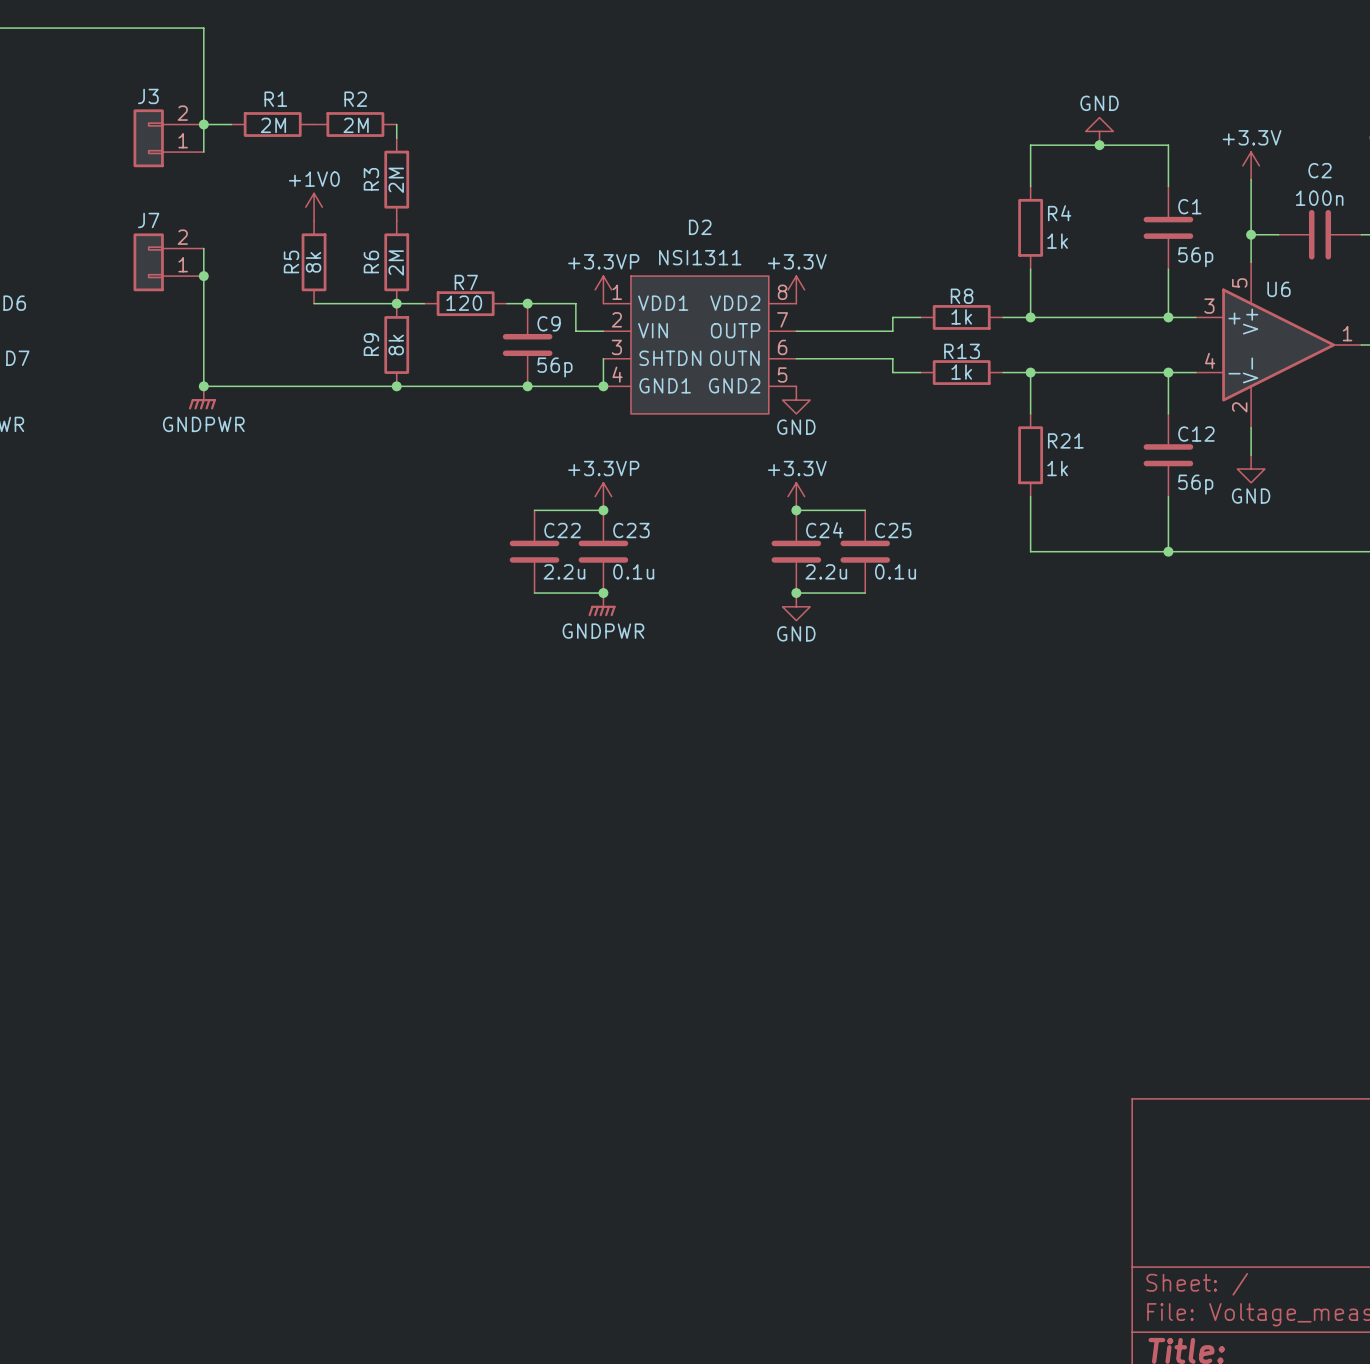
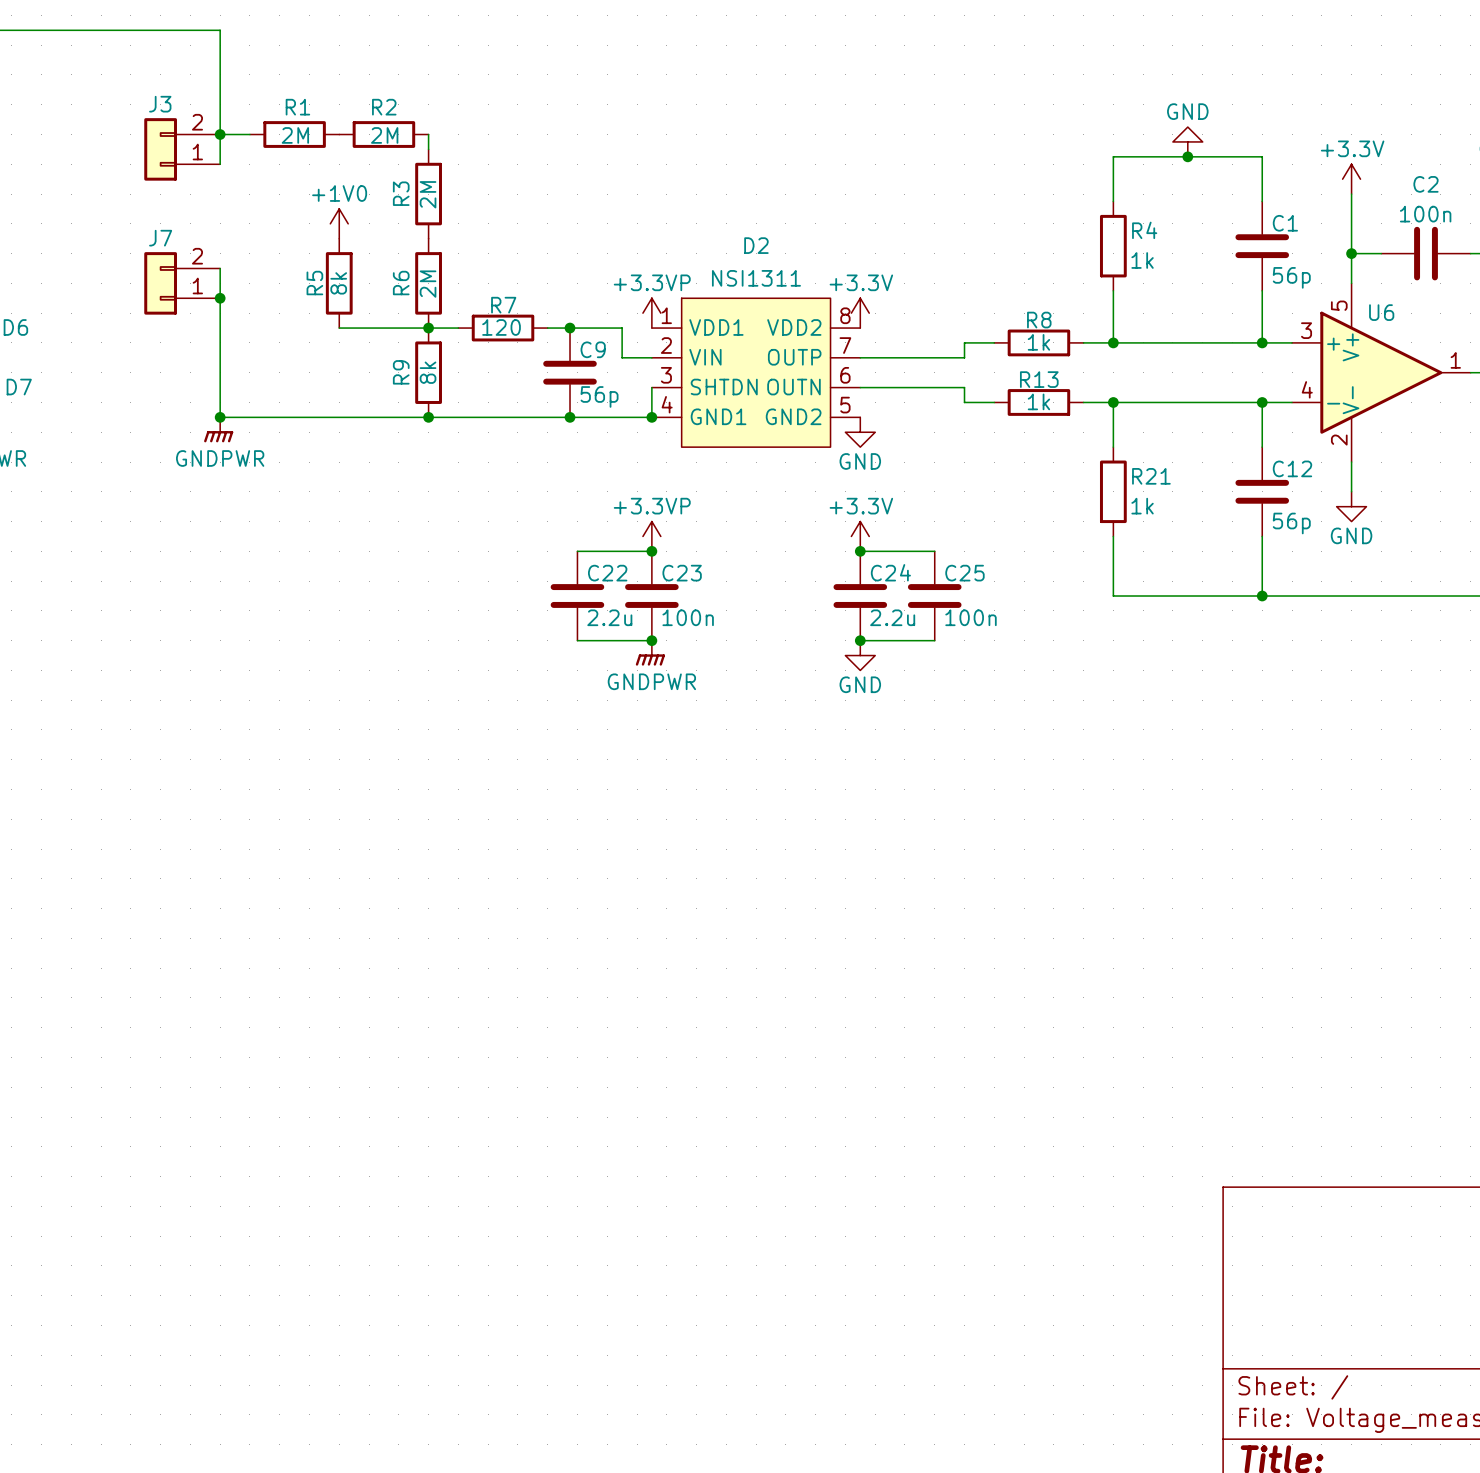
C23 value: 0.1u (633, 571) -> 100n (688, 617)
C25 value: 0.1u (895, 571) -> 100n (971, 617)

